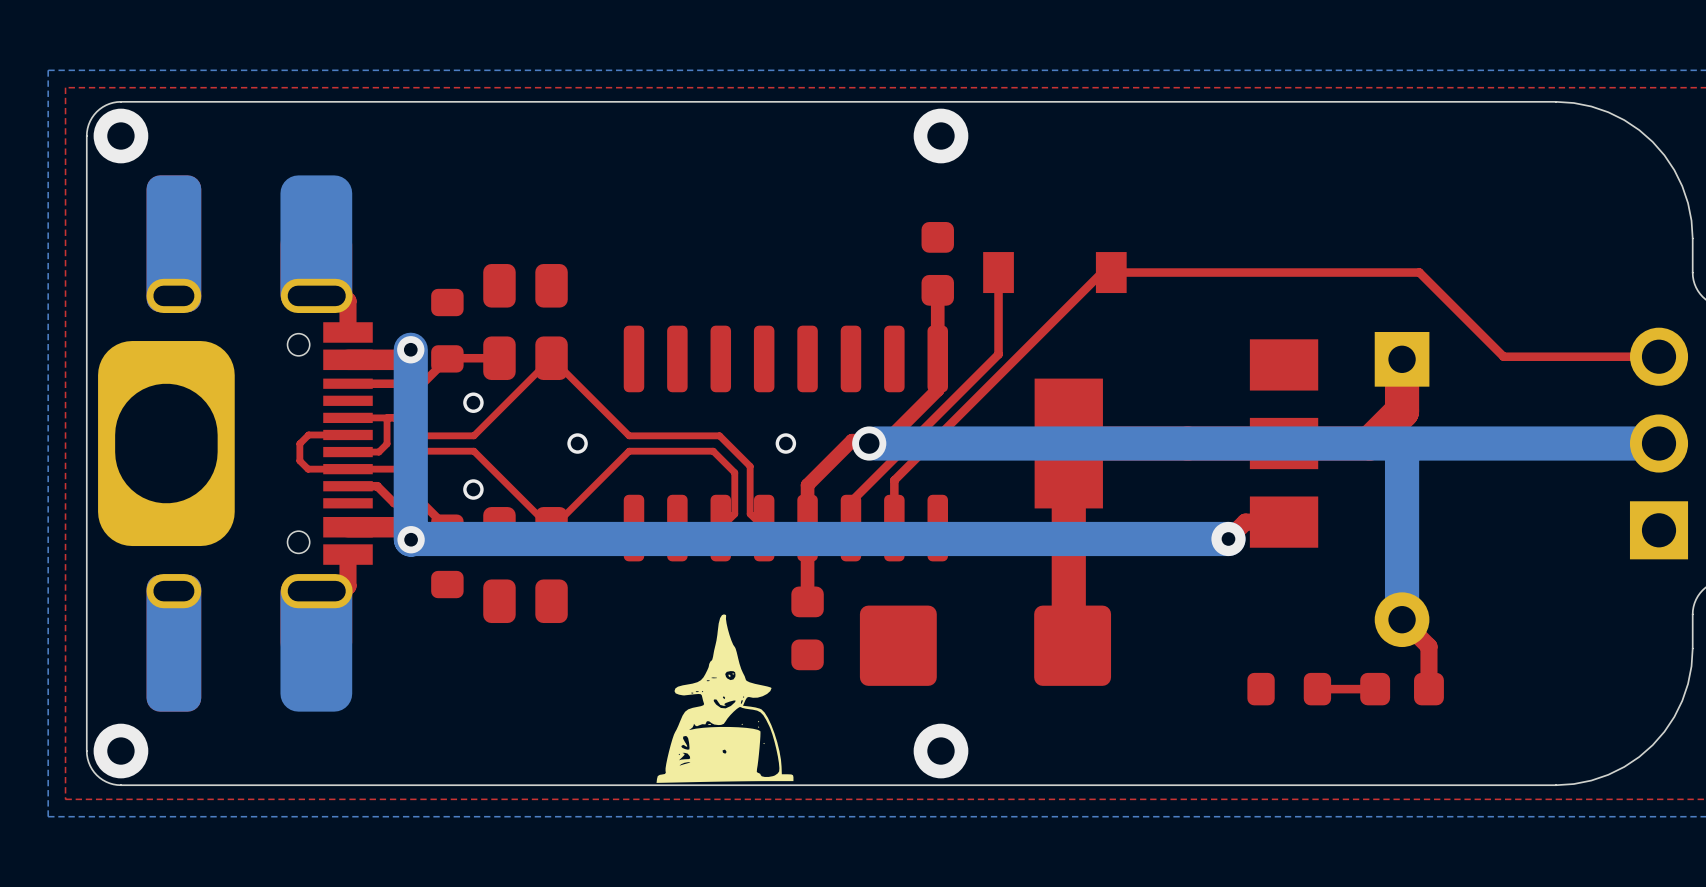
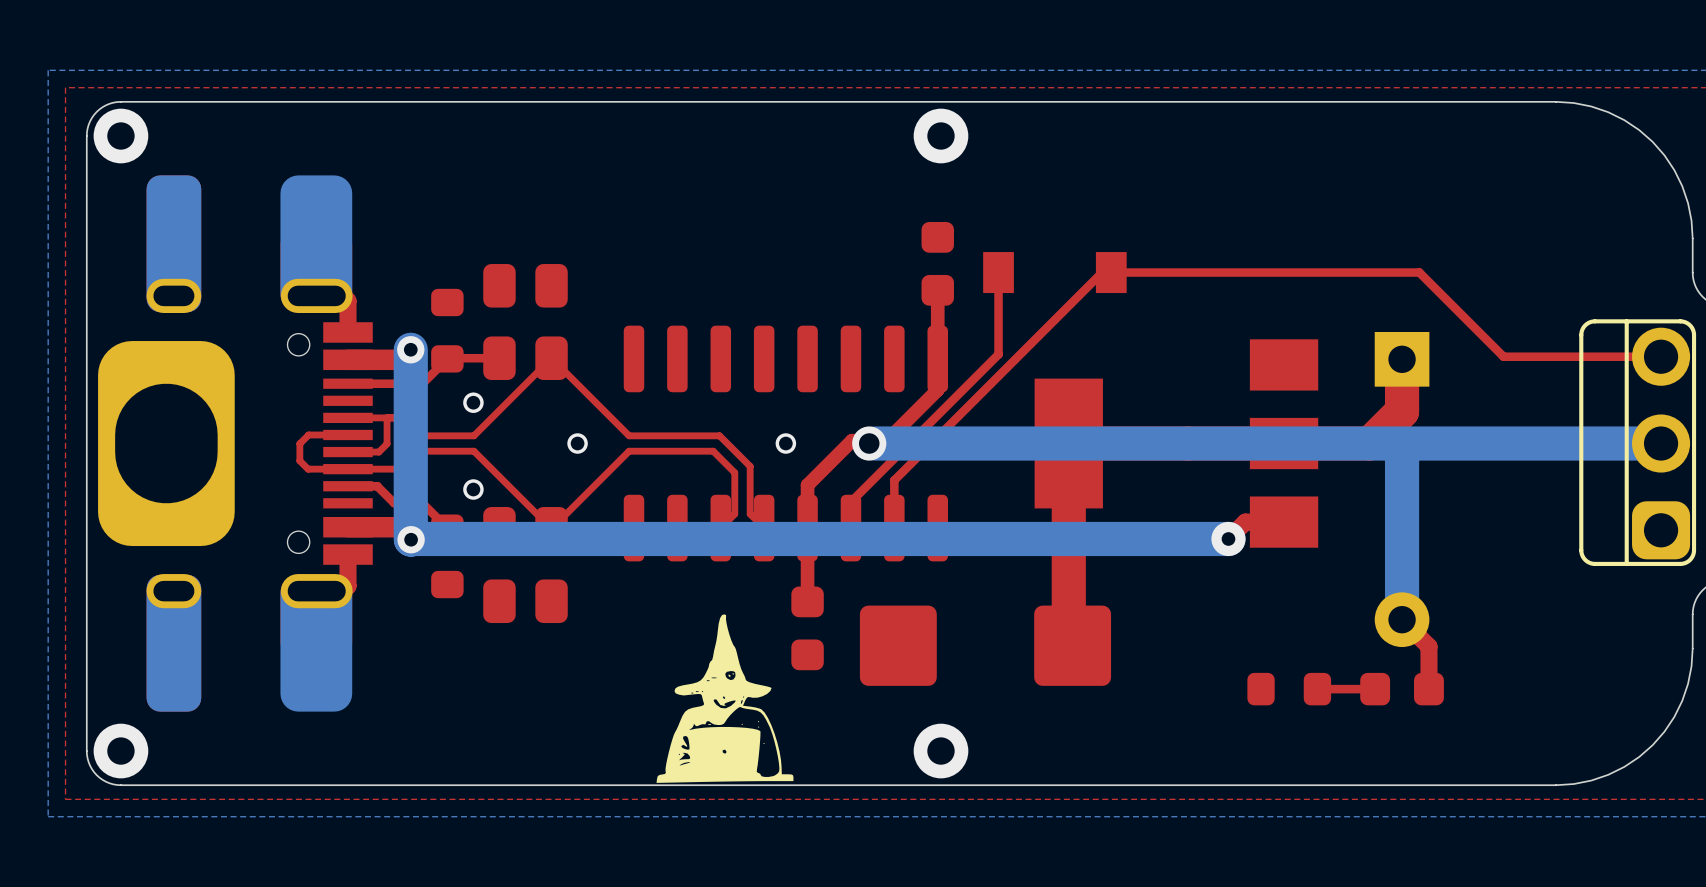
part footprint: [1629, 327, 1689, 560] -> [1579, 319, 1697, 566]

